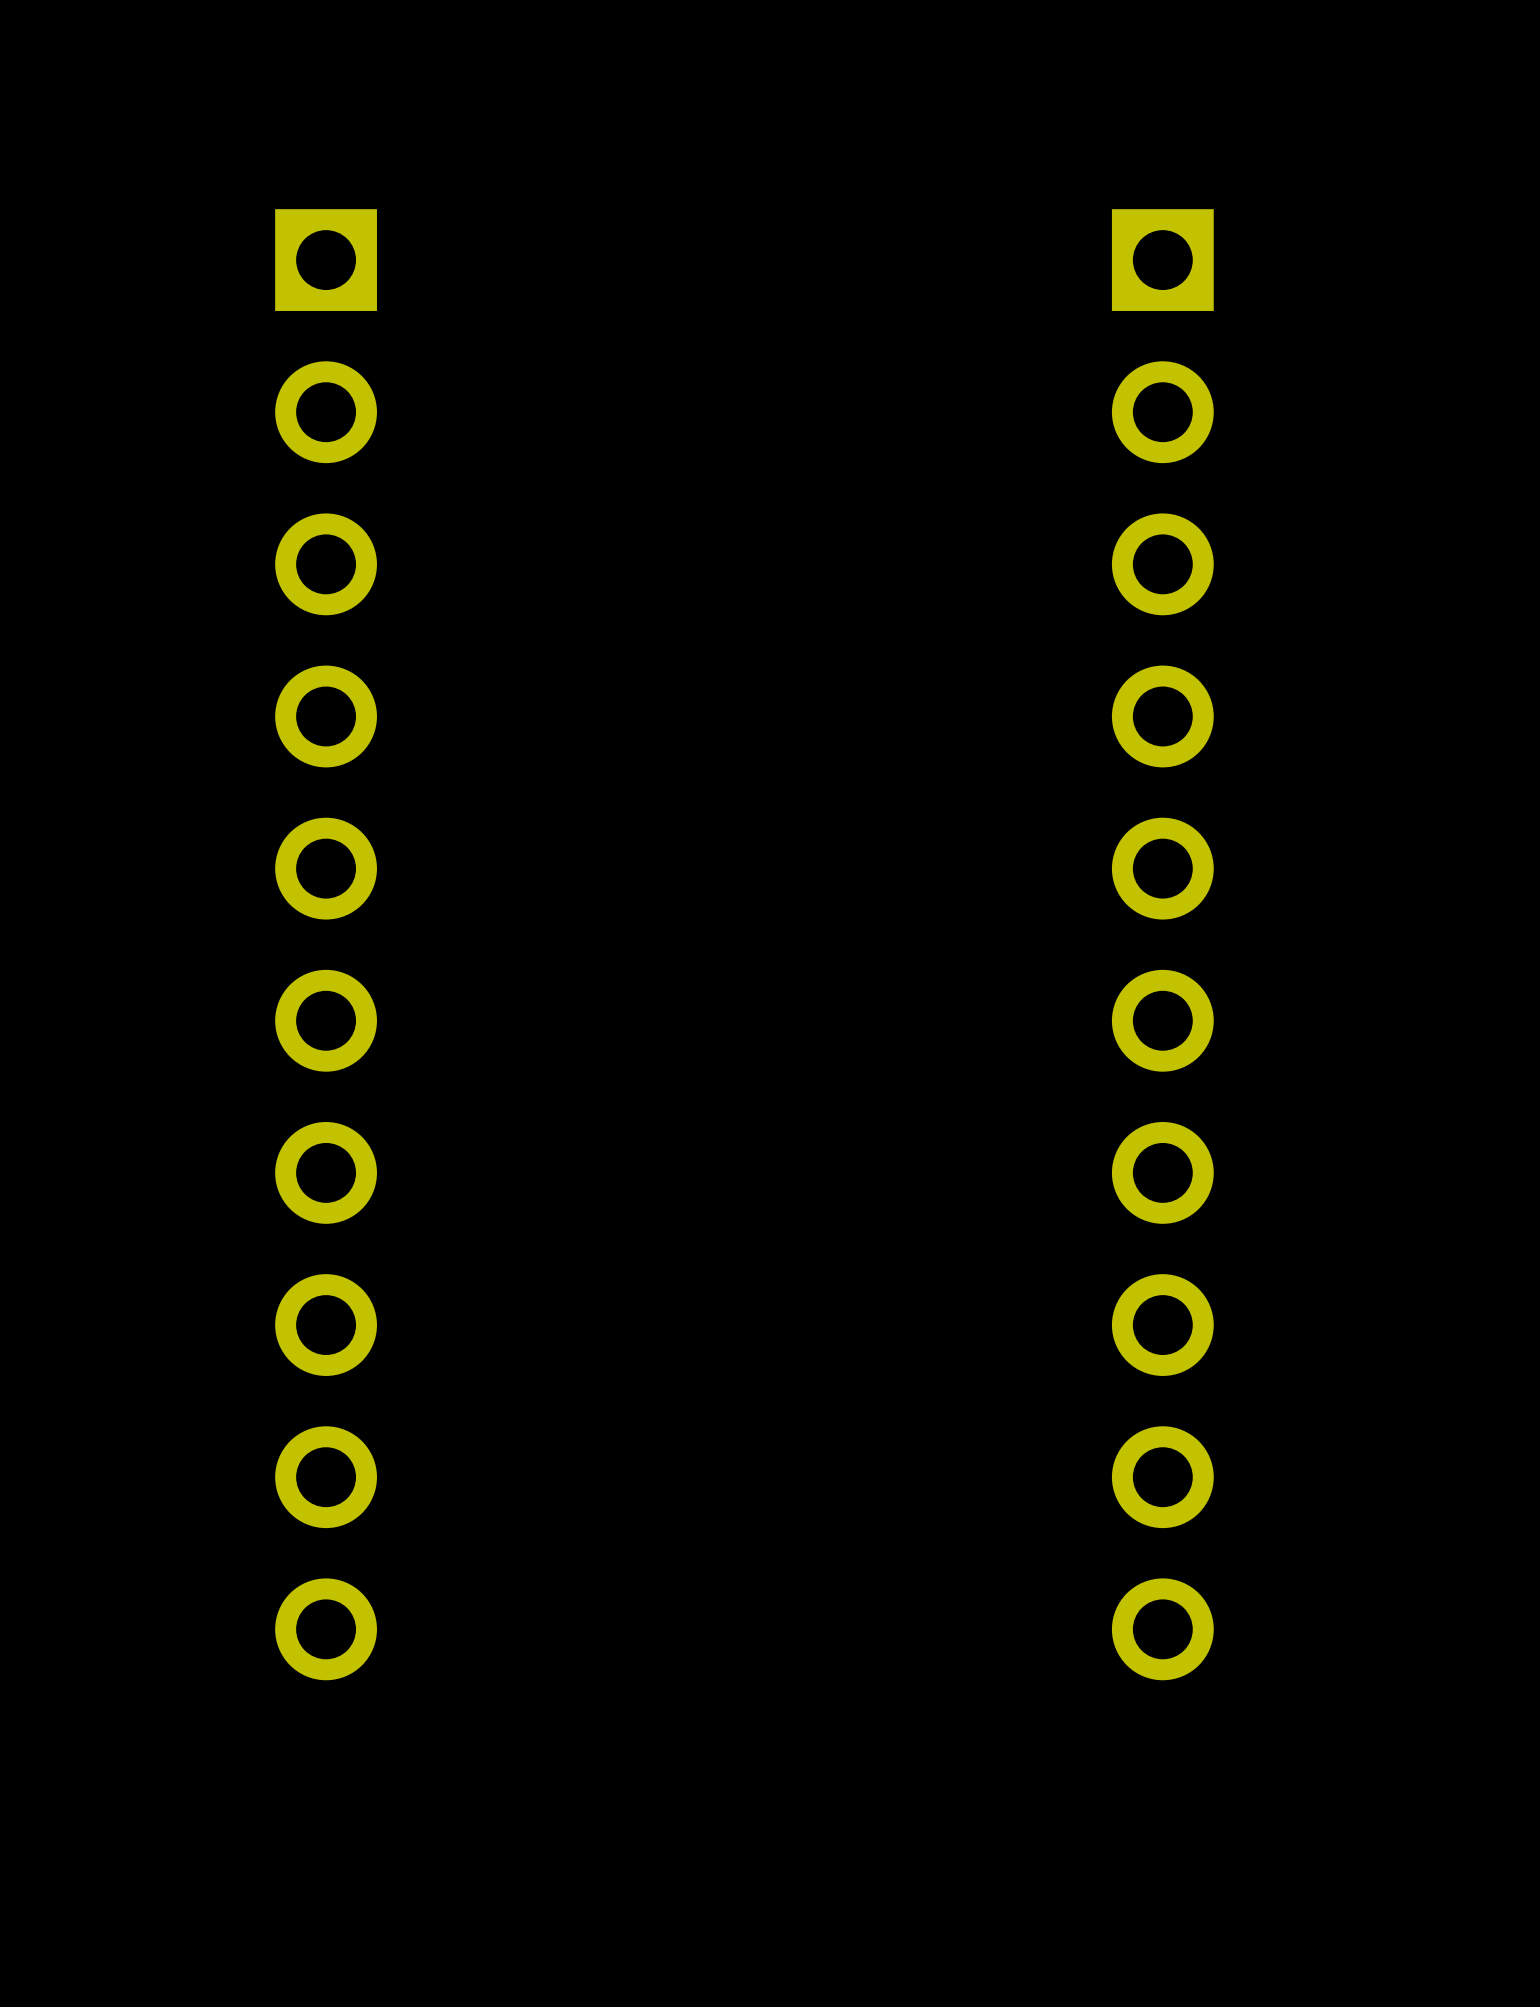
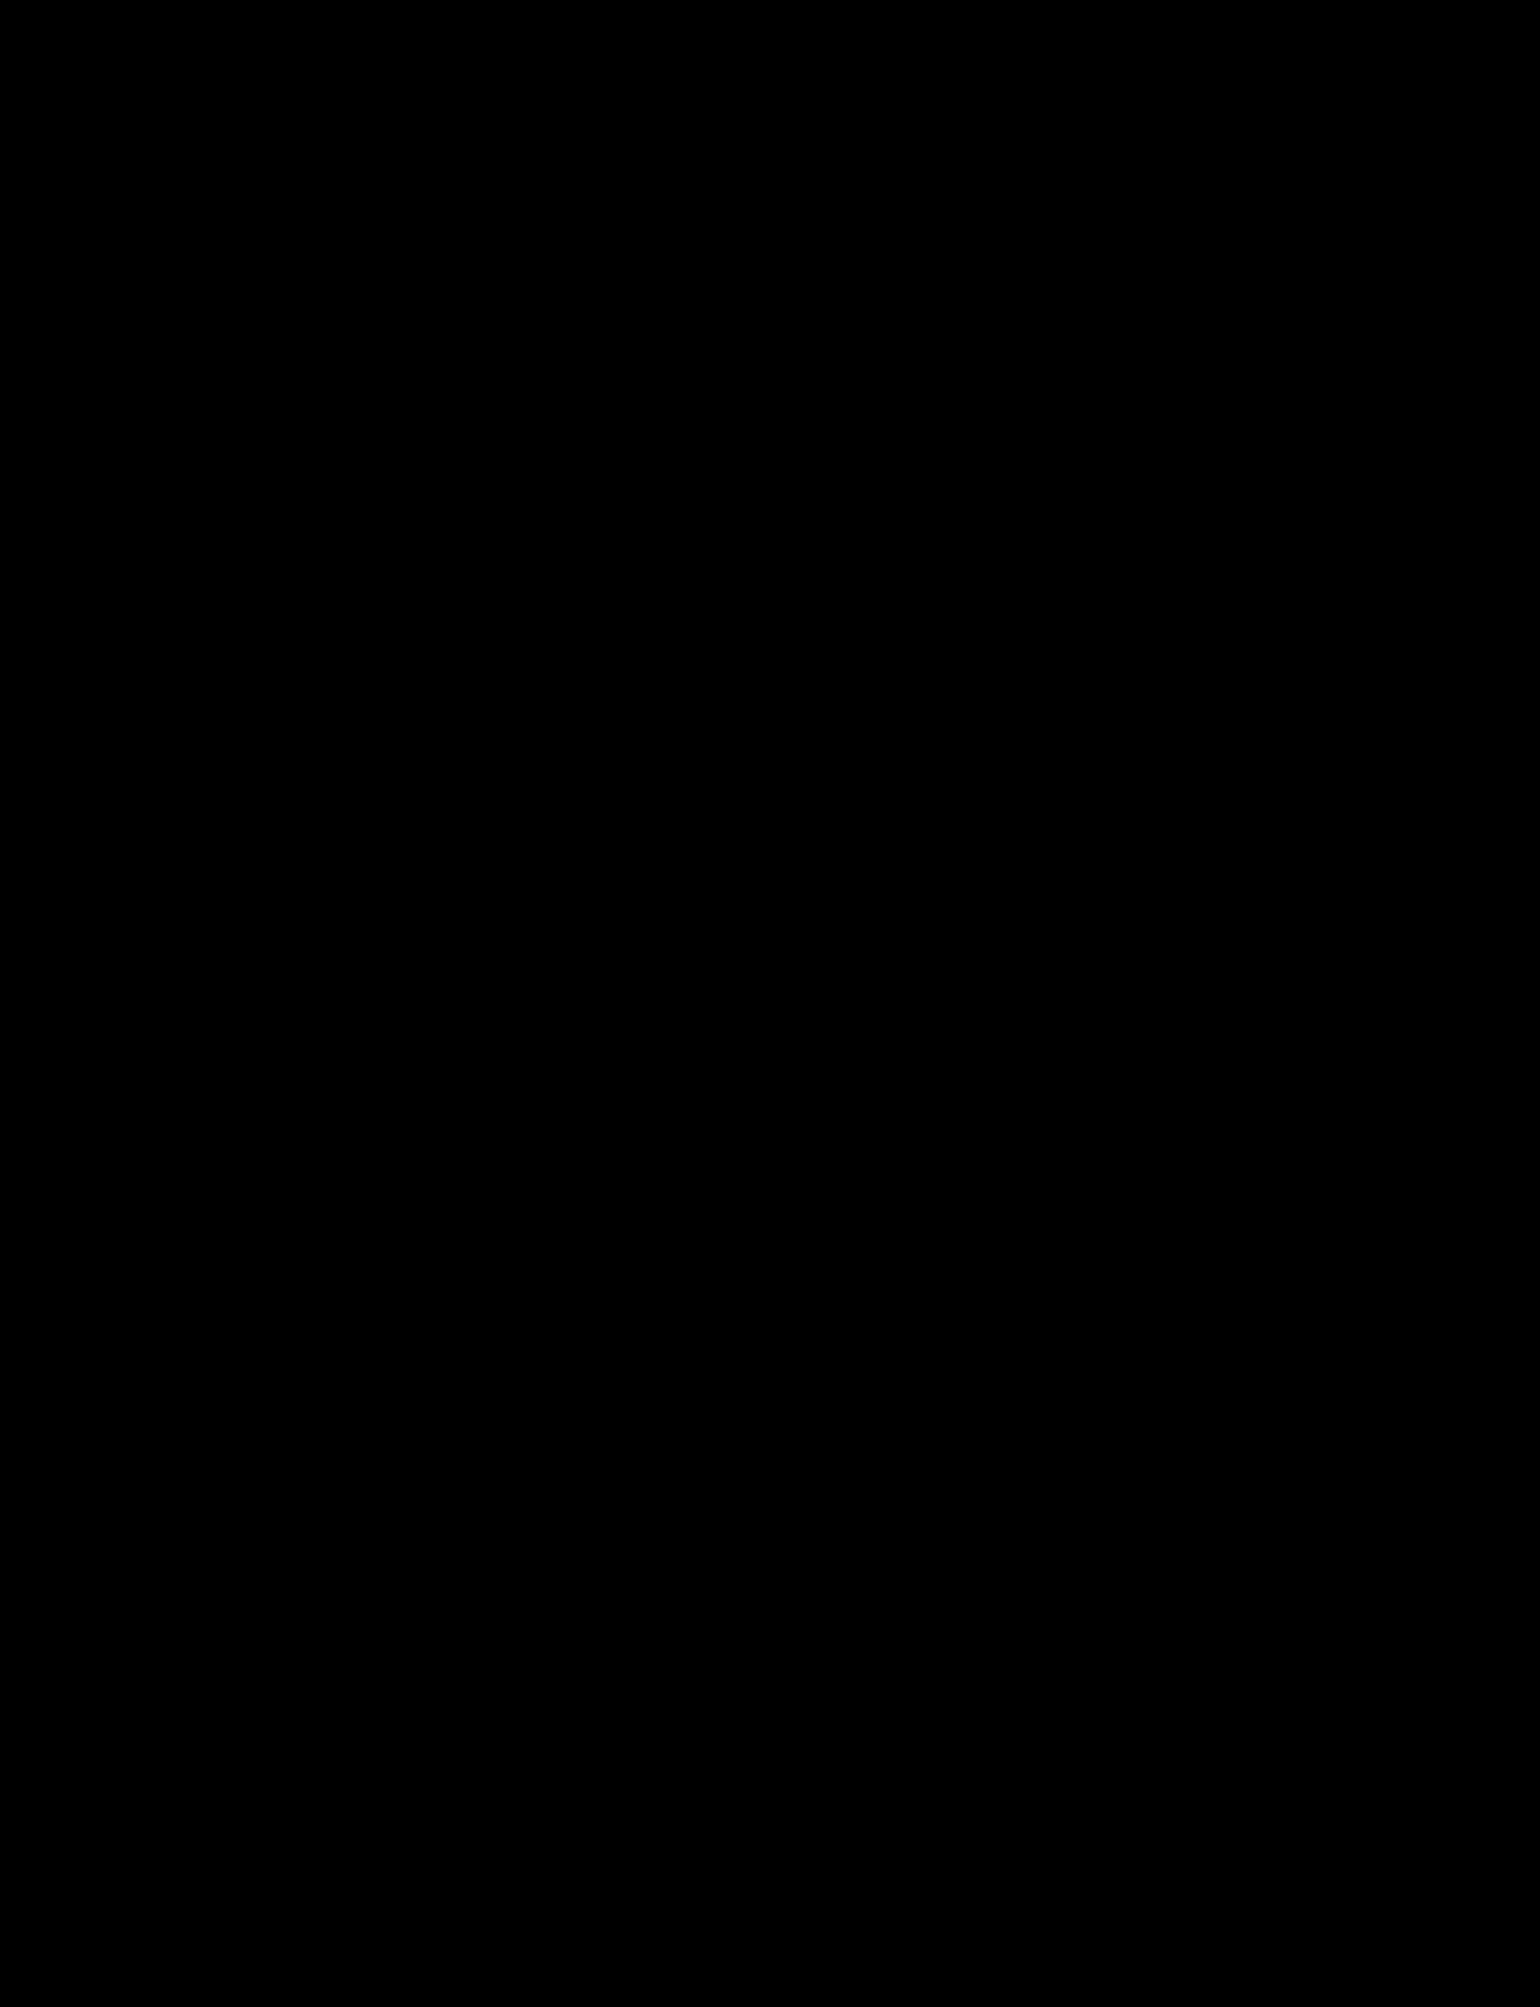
part: (326, 944) -> none
part: (1162, 944) -> none

